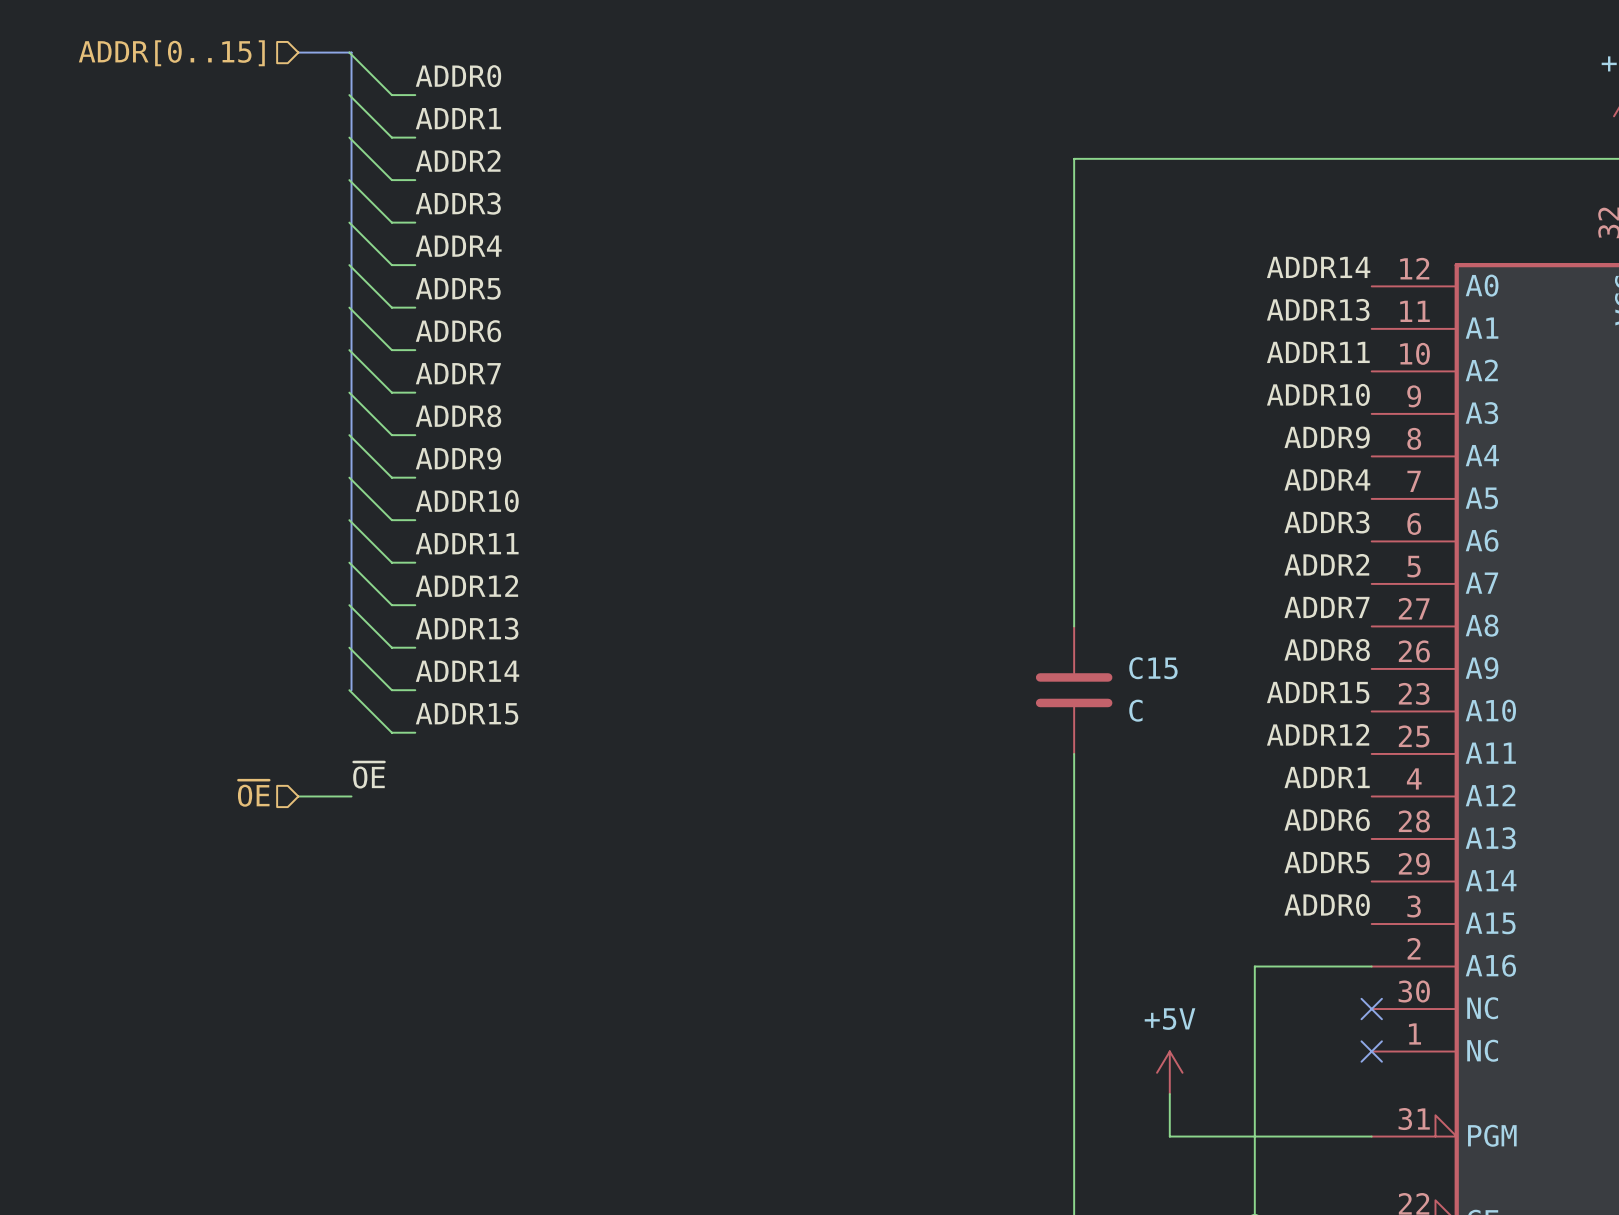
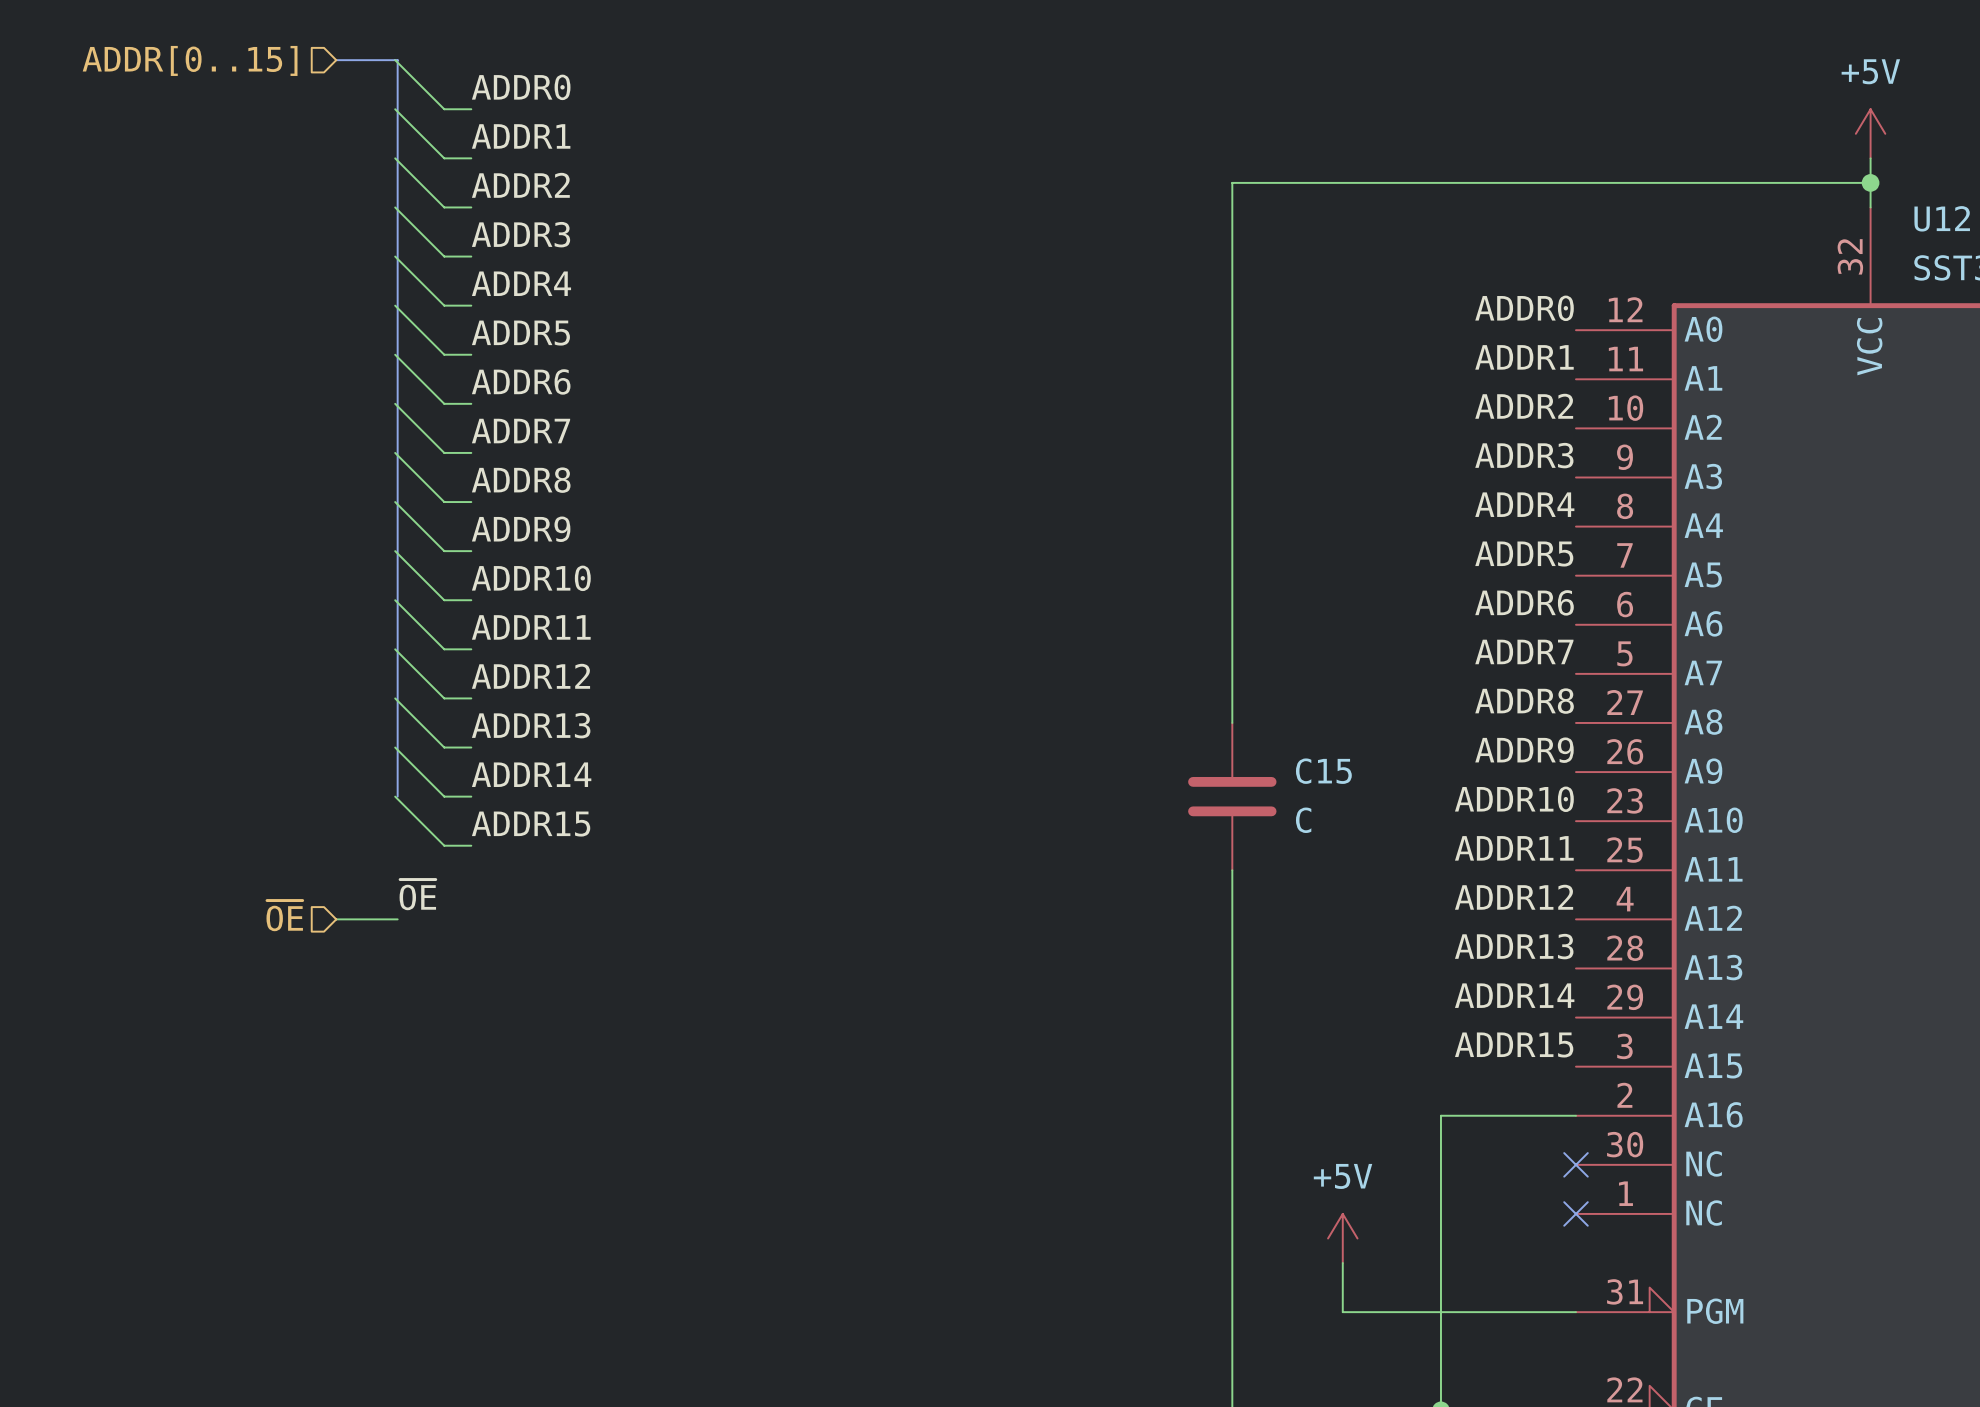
label: ADDR14 (1318, 267) -> ADDR0 (1524, 308)
label: ADDR13 (1318, 309) -> ADDR1 (1524, 357)
label: ADDR11 (1318, 352) -> ADDR2 (1524, 406)
label: ADDR10 (1318, 394) -> ADDR3 (1524, 455)
label: ADDR9 (1327, 437) -> ADDR4 (1524, 504)
label: ADDR4 (1327, 479) -> ADDR5 (1524, 554)
label: ADDR3 (1327, 522) -> ADDR6 (1524, 602)
label: ADDR2 (1326, 564) -> ADDR7 (1524, 651)
label: ADDR7 (1327, 607) -> ADDR8 (1524, 701)
label: ADDR8 (1327, 650) -> ADDR9 (1524, 750)
label: ADDR15 (1318, 692) -> ADDR10 (1514, 799)
label: ADDR12 (1318, 734) -> ADDR11 (1514, 848)
label: ADDR1 (1327, 777) -> ADDR12 (1514, 897)
label: ADDR6 (1327, 820) -> ADDR13 (1514, 946)
label: ADDR5 (1326, 862) -> ADDR14 (1514, 995)
label: ADDR0 (1327, 905) -> ADDR15 (1514, 1044)

